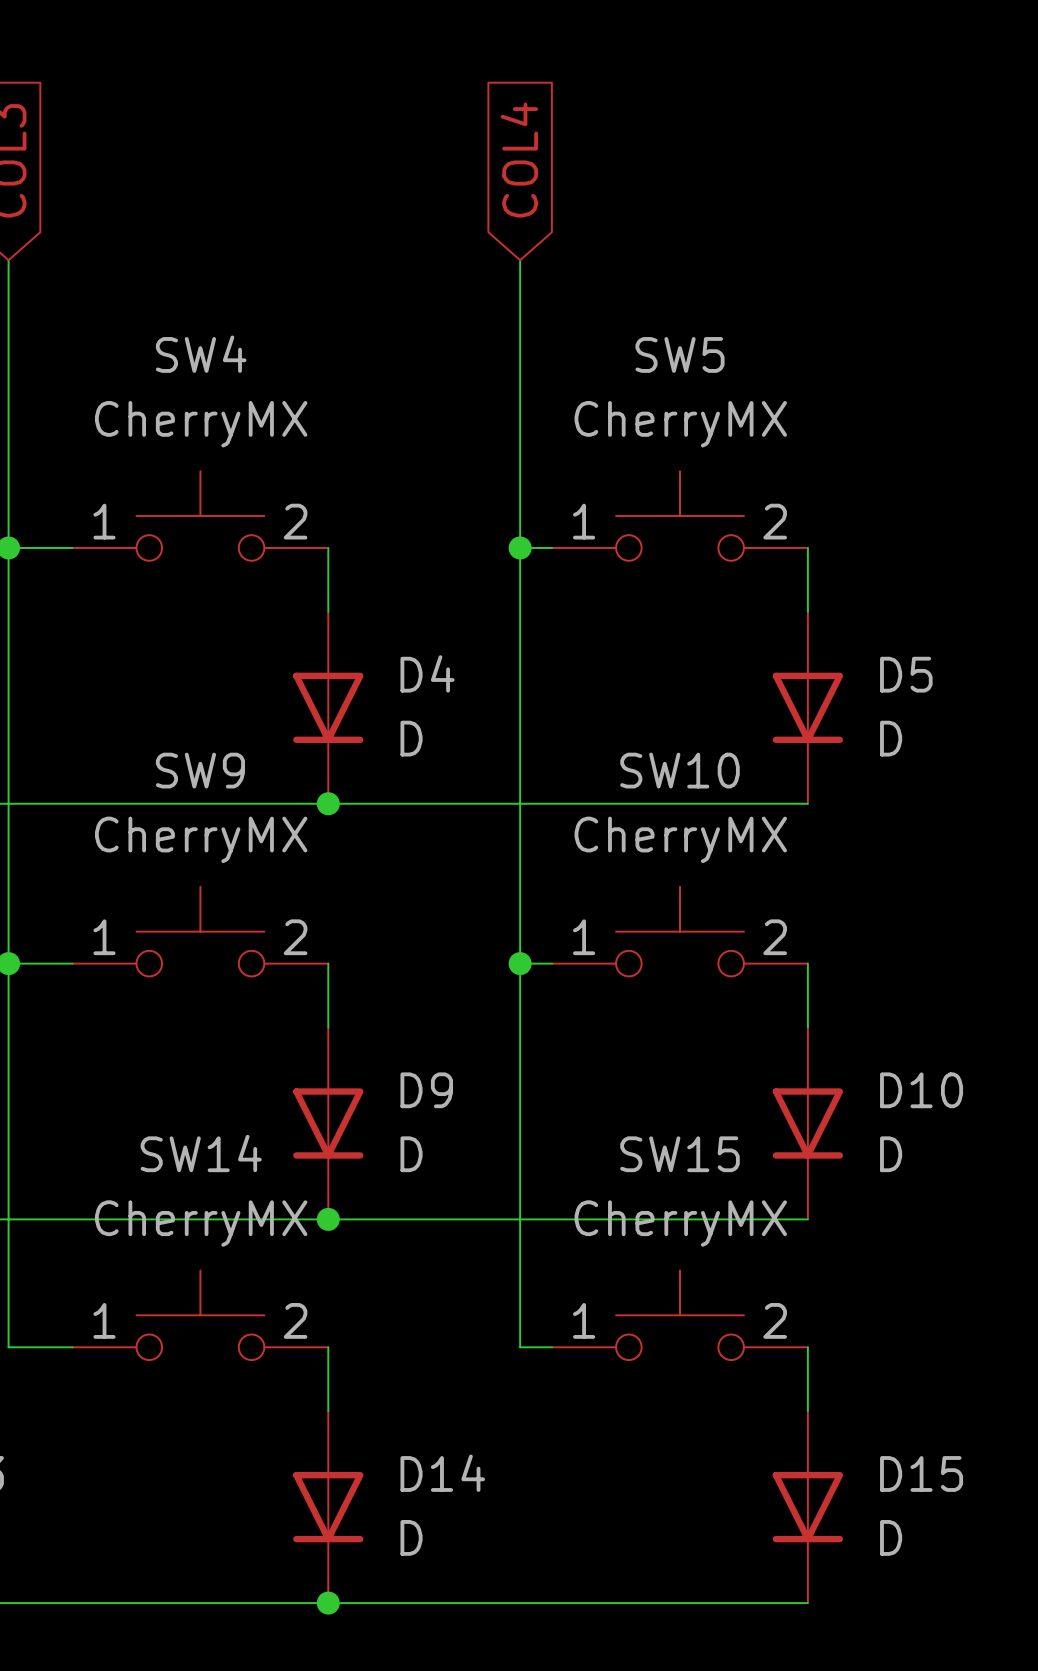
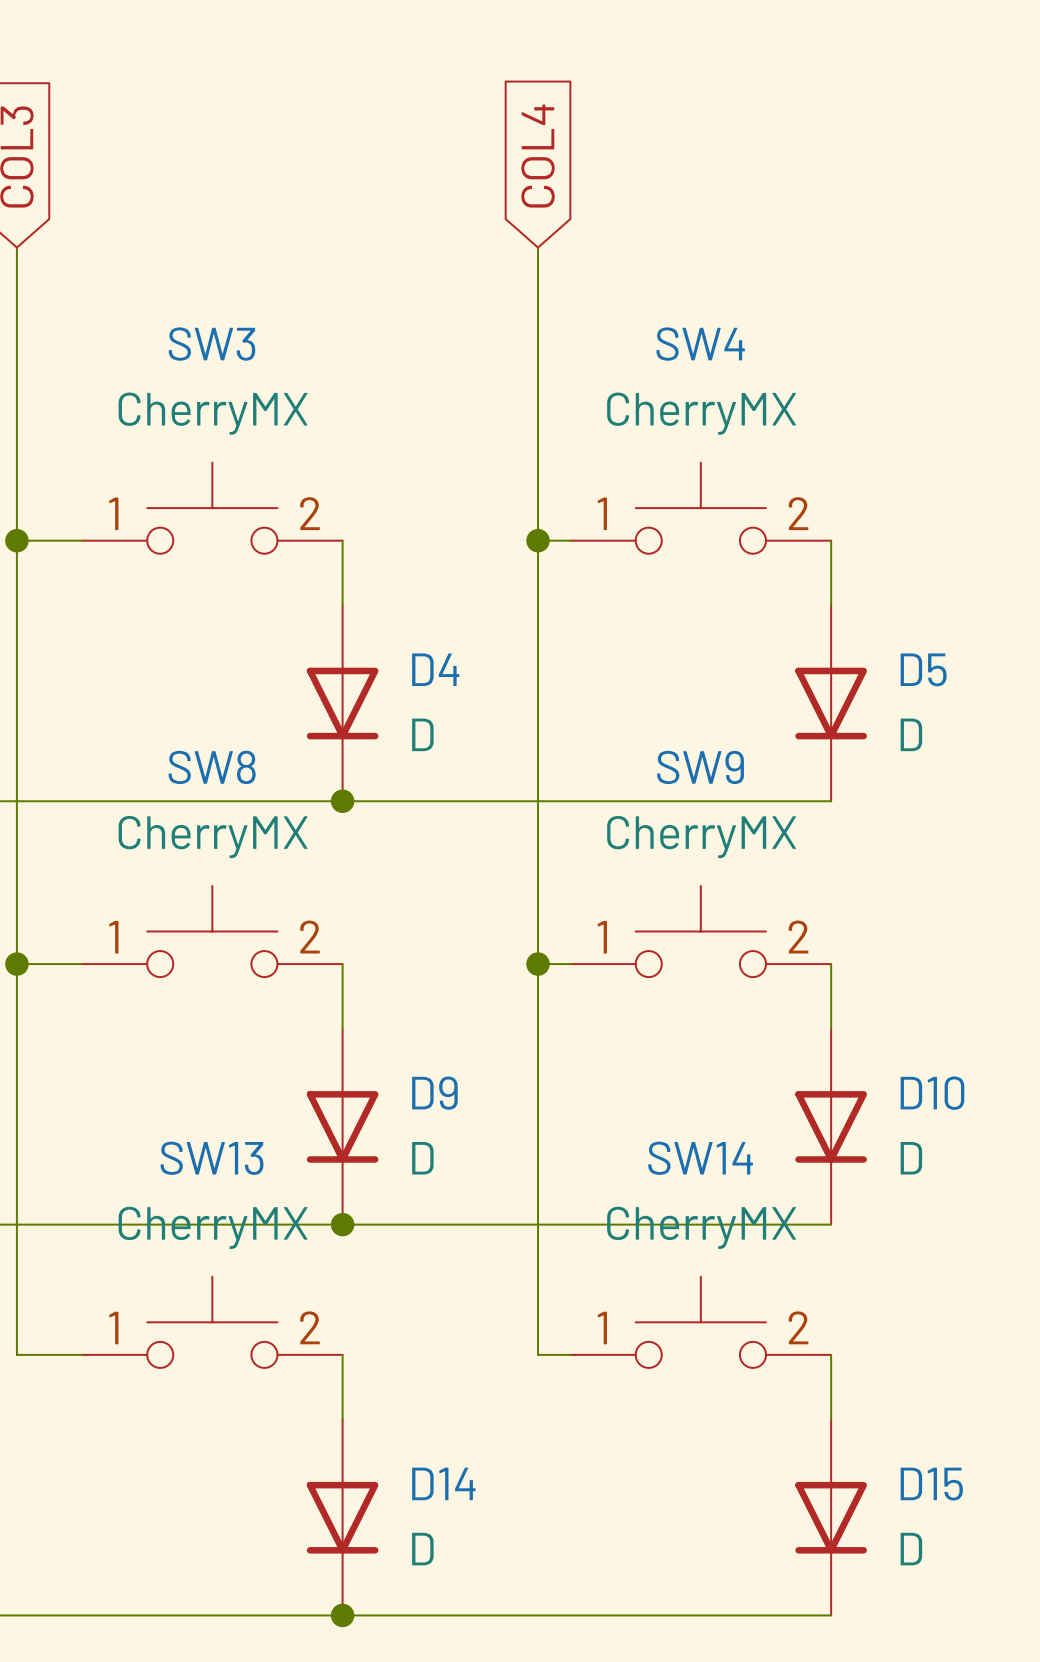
SW4 name: SW4 (201, 354) -> SW3 (212, 344)
SW5 name: SW5 (680, 354) -> SW4 (700, 344)
SW9 name: SW9 (200, 770) -> SW8 (212, 767)
SW10 name: SW10 (680, 770) -> SW9 (700, 767)
SW14 name: SW14 (201, 1153) -> SW13 (212, 1158)
SW15 name: SW15 (680, 1154) -> SW14 (700, 1158)

